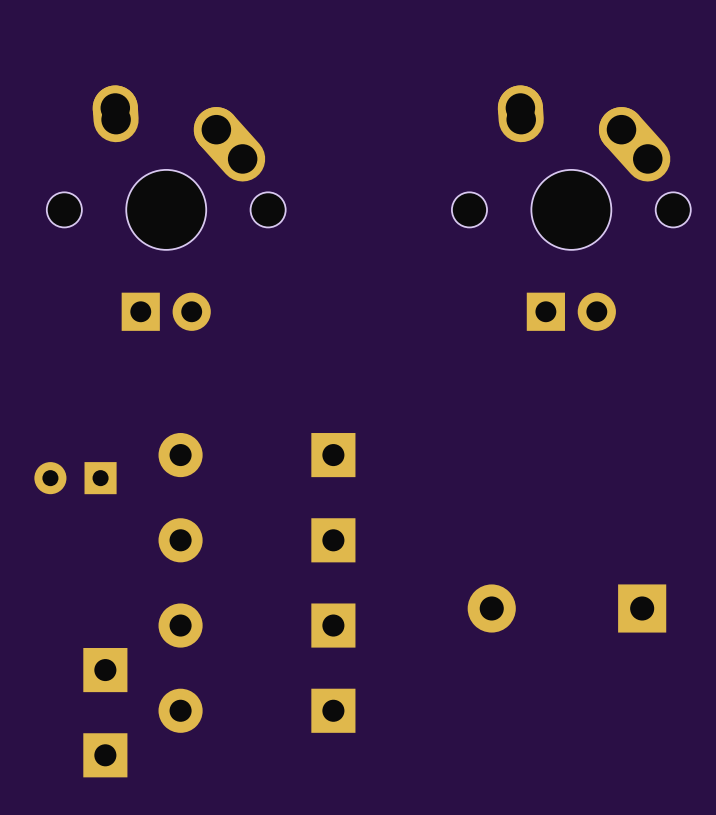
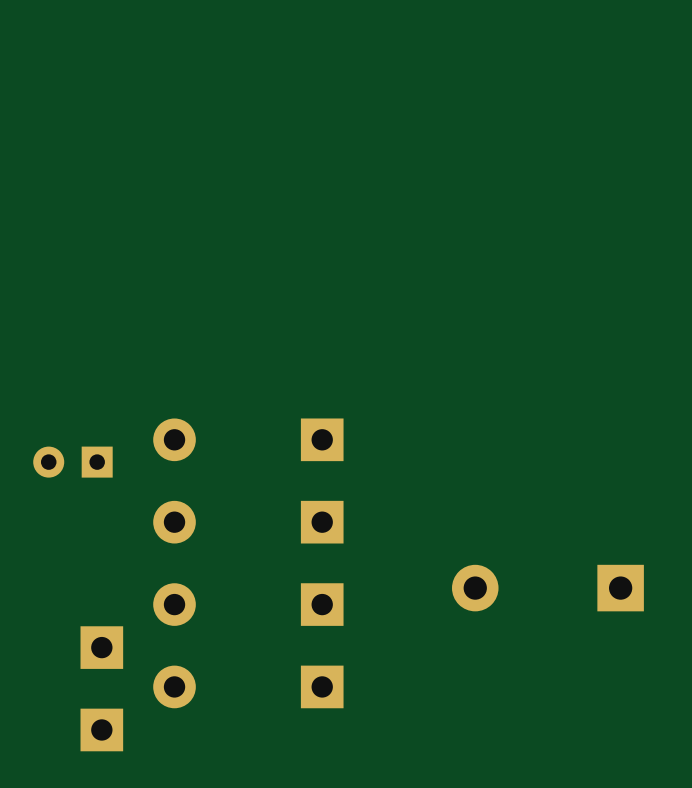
part: (166, 208) -> none
part: (571, 208) -> none

